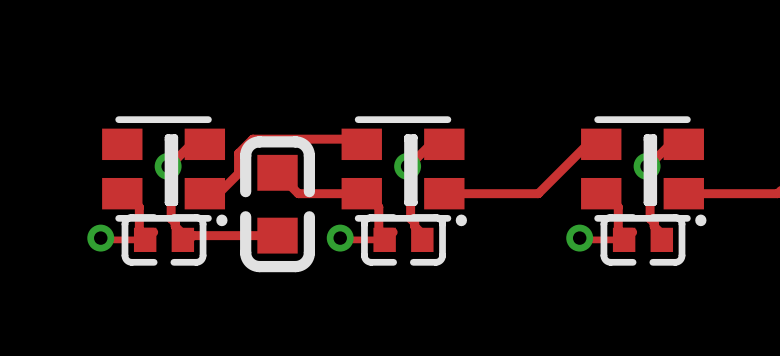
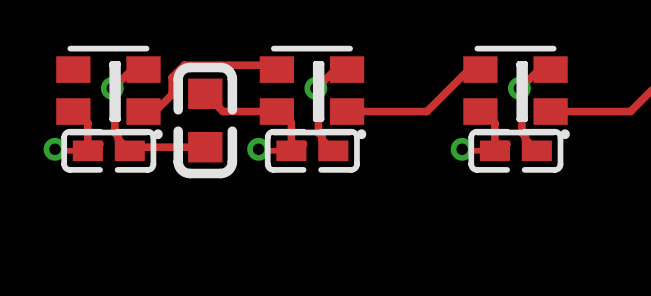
part footprint: [121, 214, 207, 266] -> [61, 128, 157, 173]
part footprint: [361, 214, 446, 266] -> [264, 128, 360, 173]
part footprint: [600, 214, 686, 266] -> [468, 128, 564, 173]

